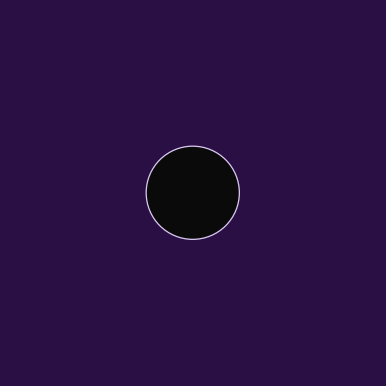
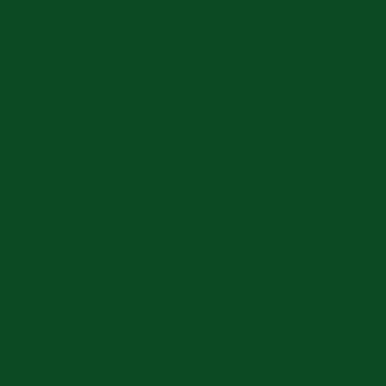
part: (192, 192) -> none

